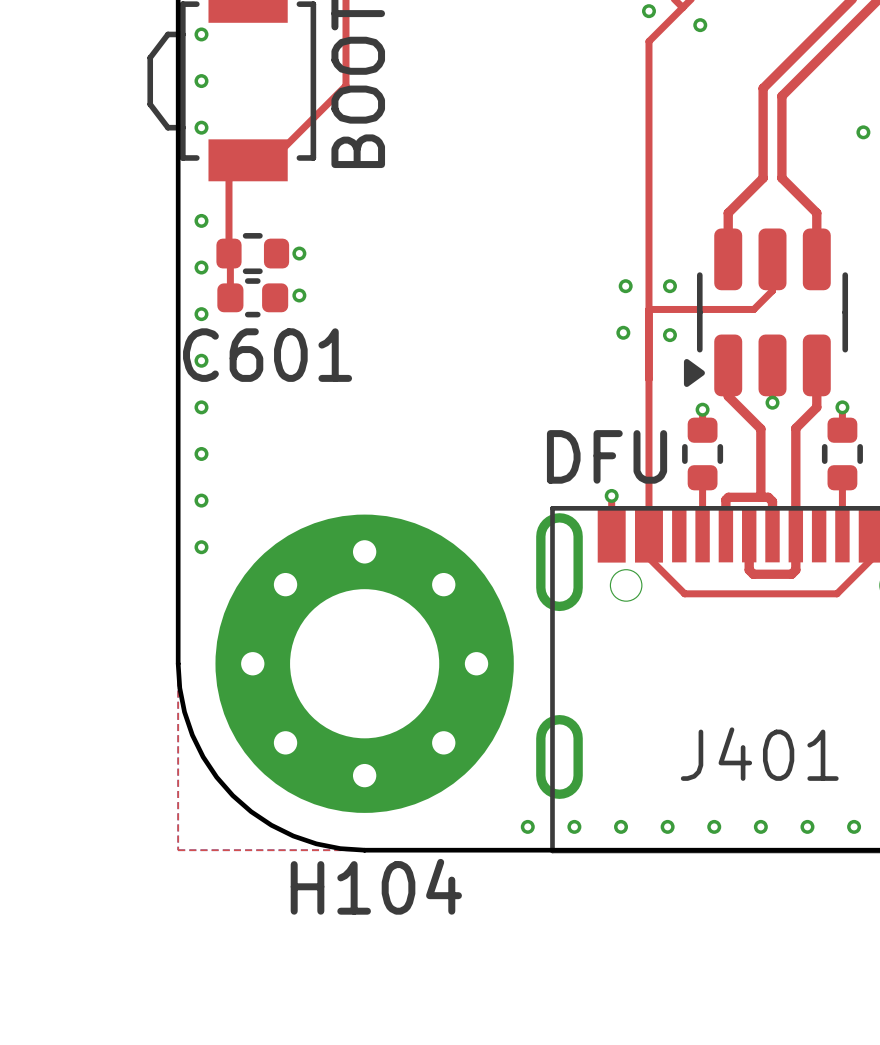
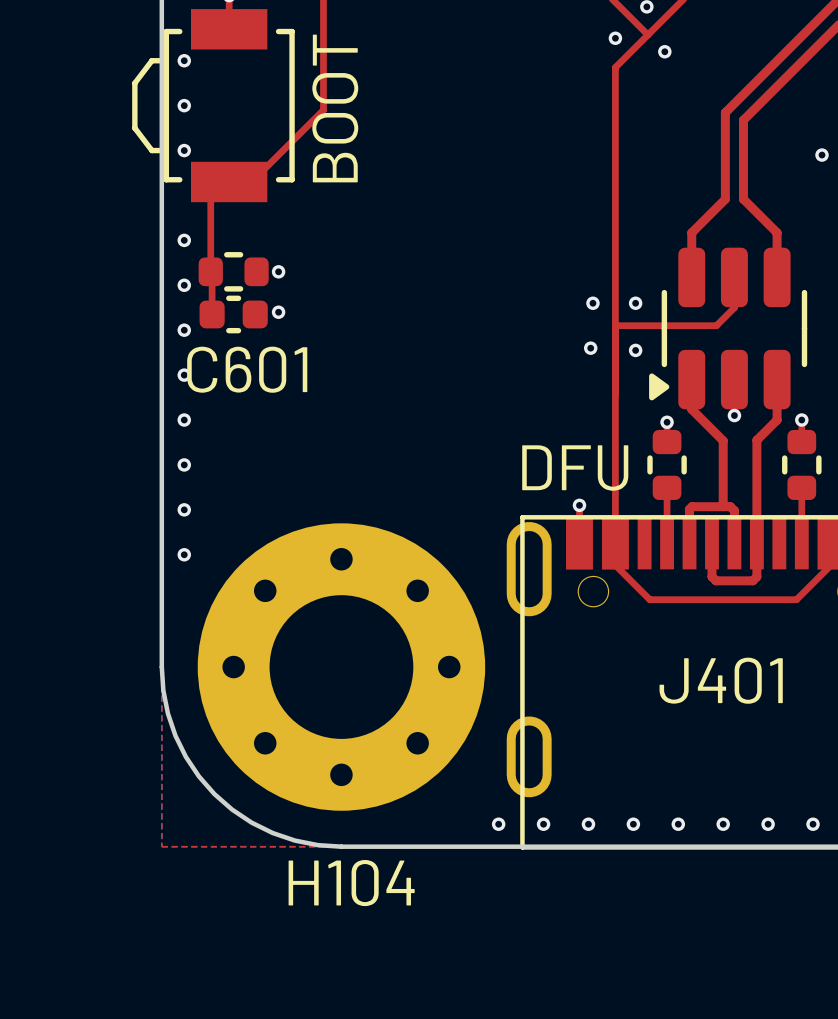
J401 name position: J401 (759, 754) -> J401 (721, 680)

